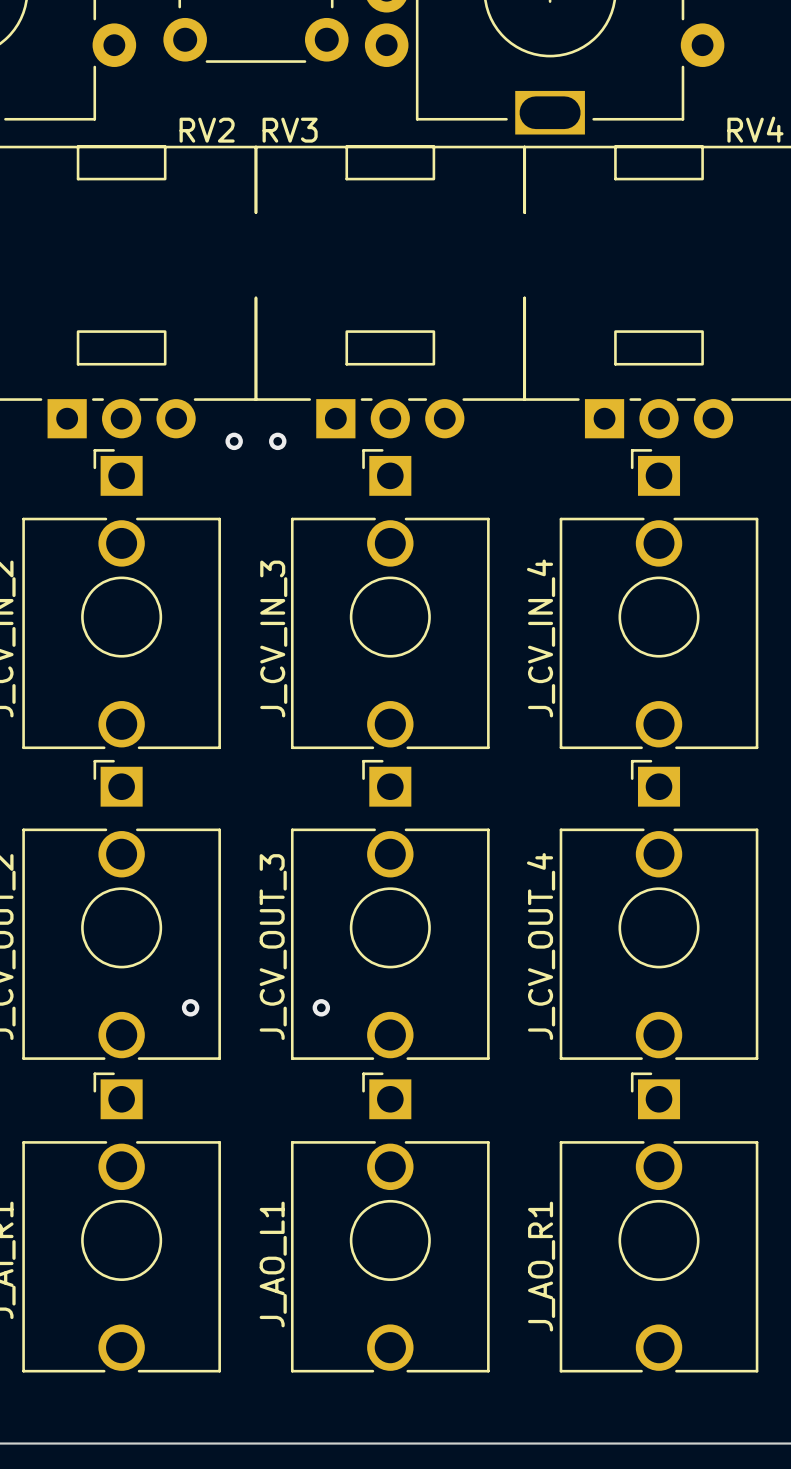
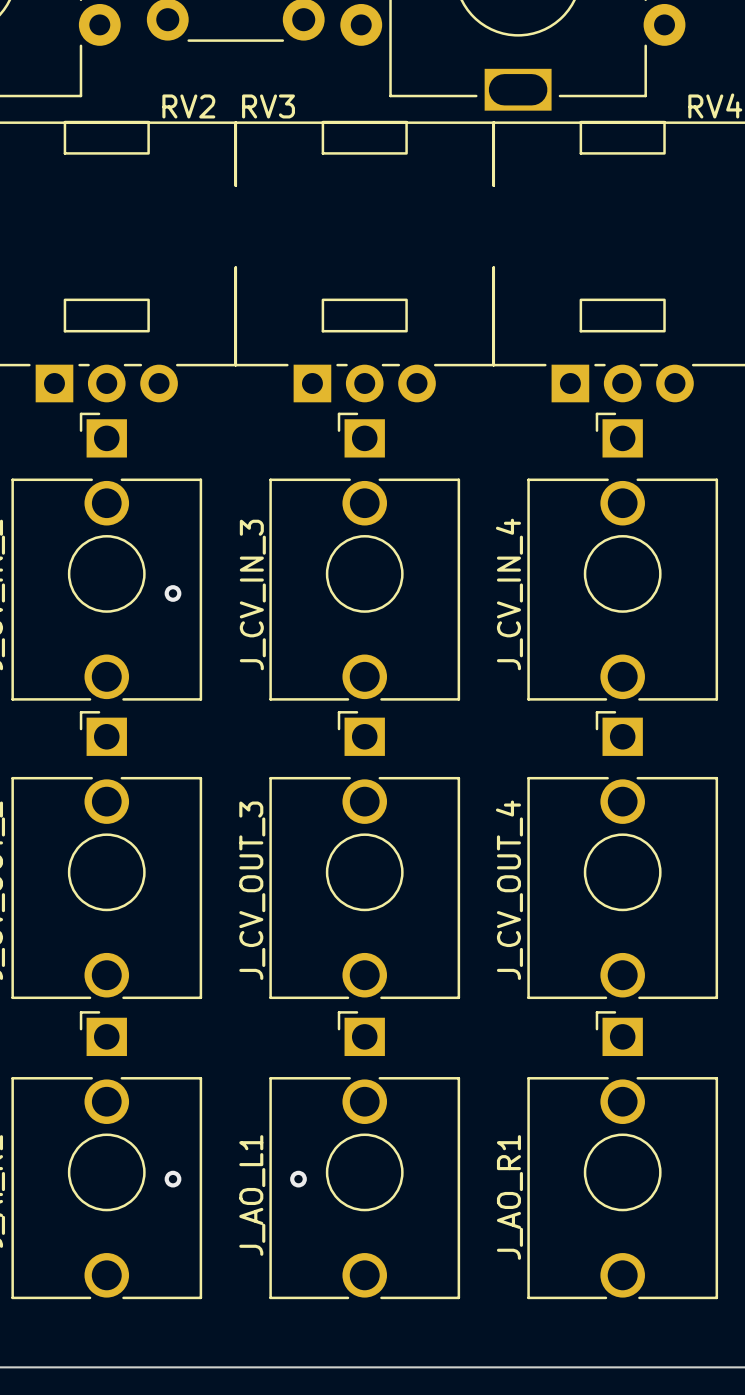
via: (234, 441) -> none
via: (277, 441) -> none
via: none -> (173, 593)
via: (190, 1007) -> none
via: (321, 1007) -> none
via: none -> (173, 1179)
via: none -> (298, 1179)

